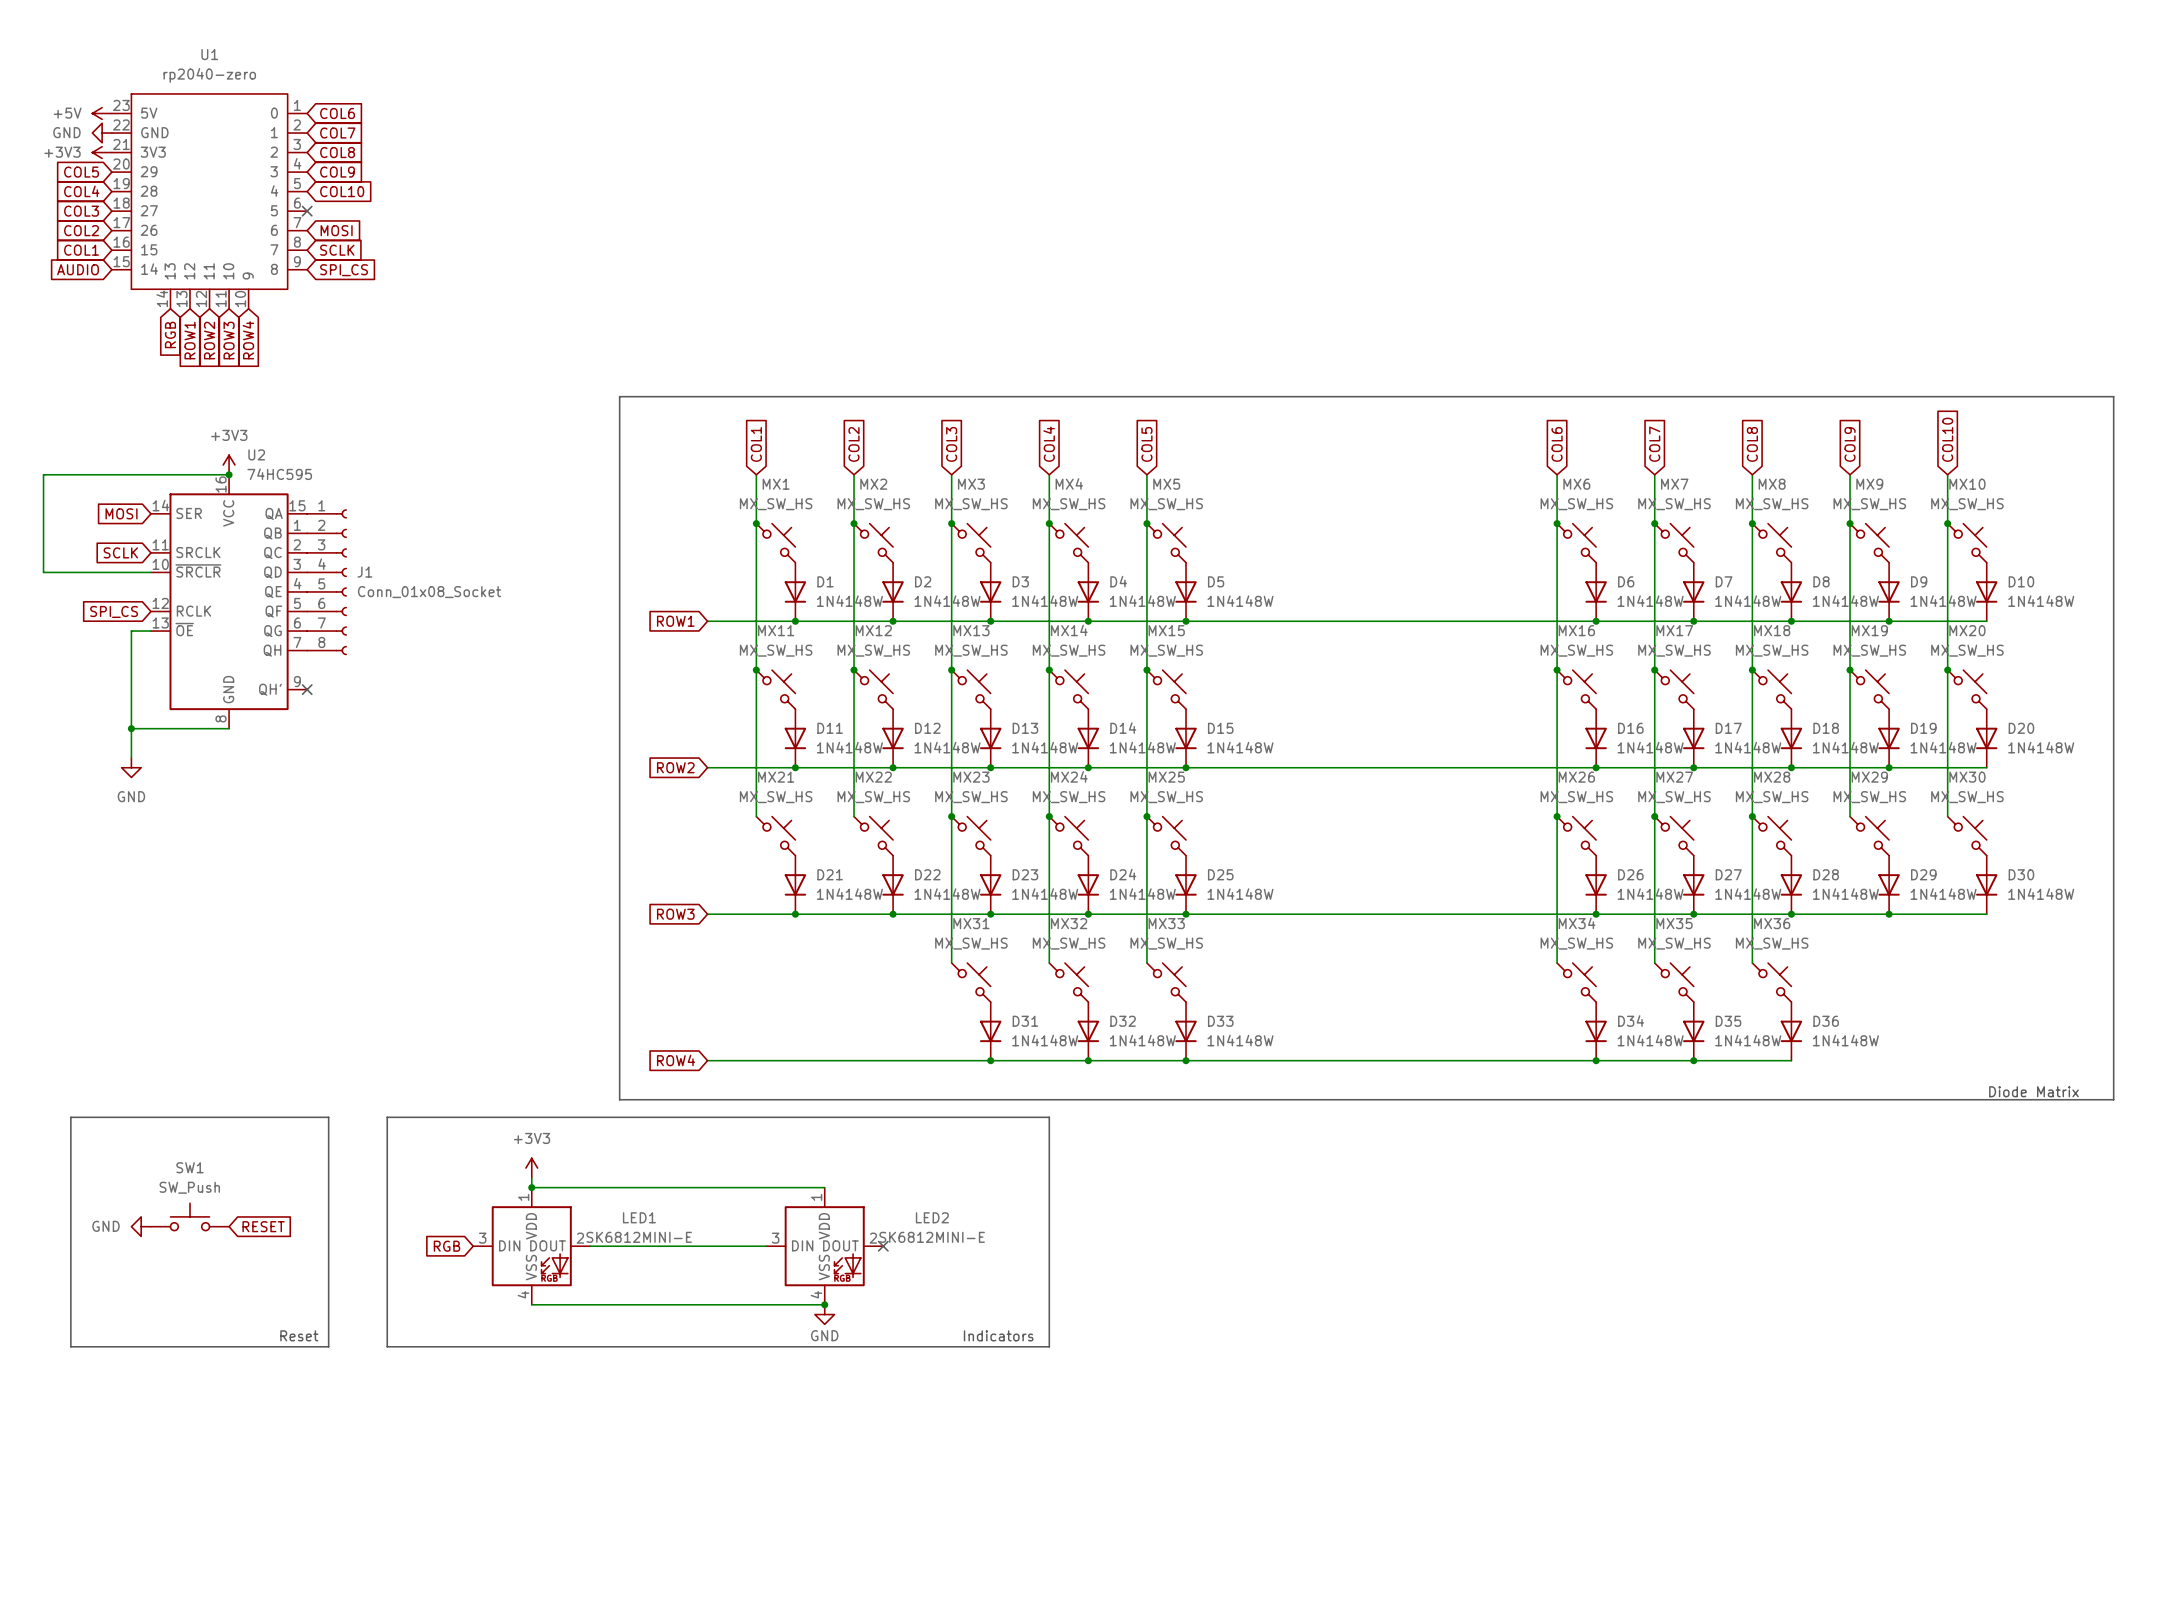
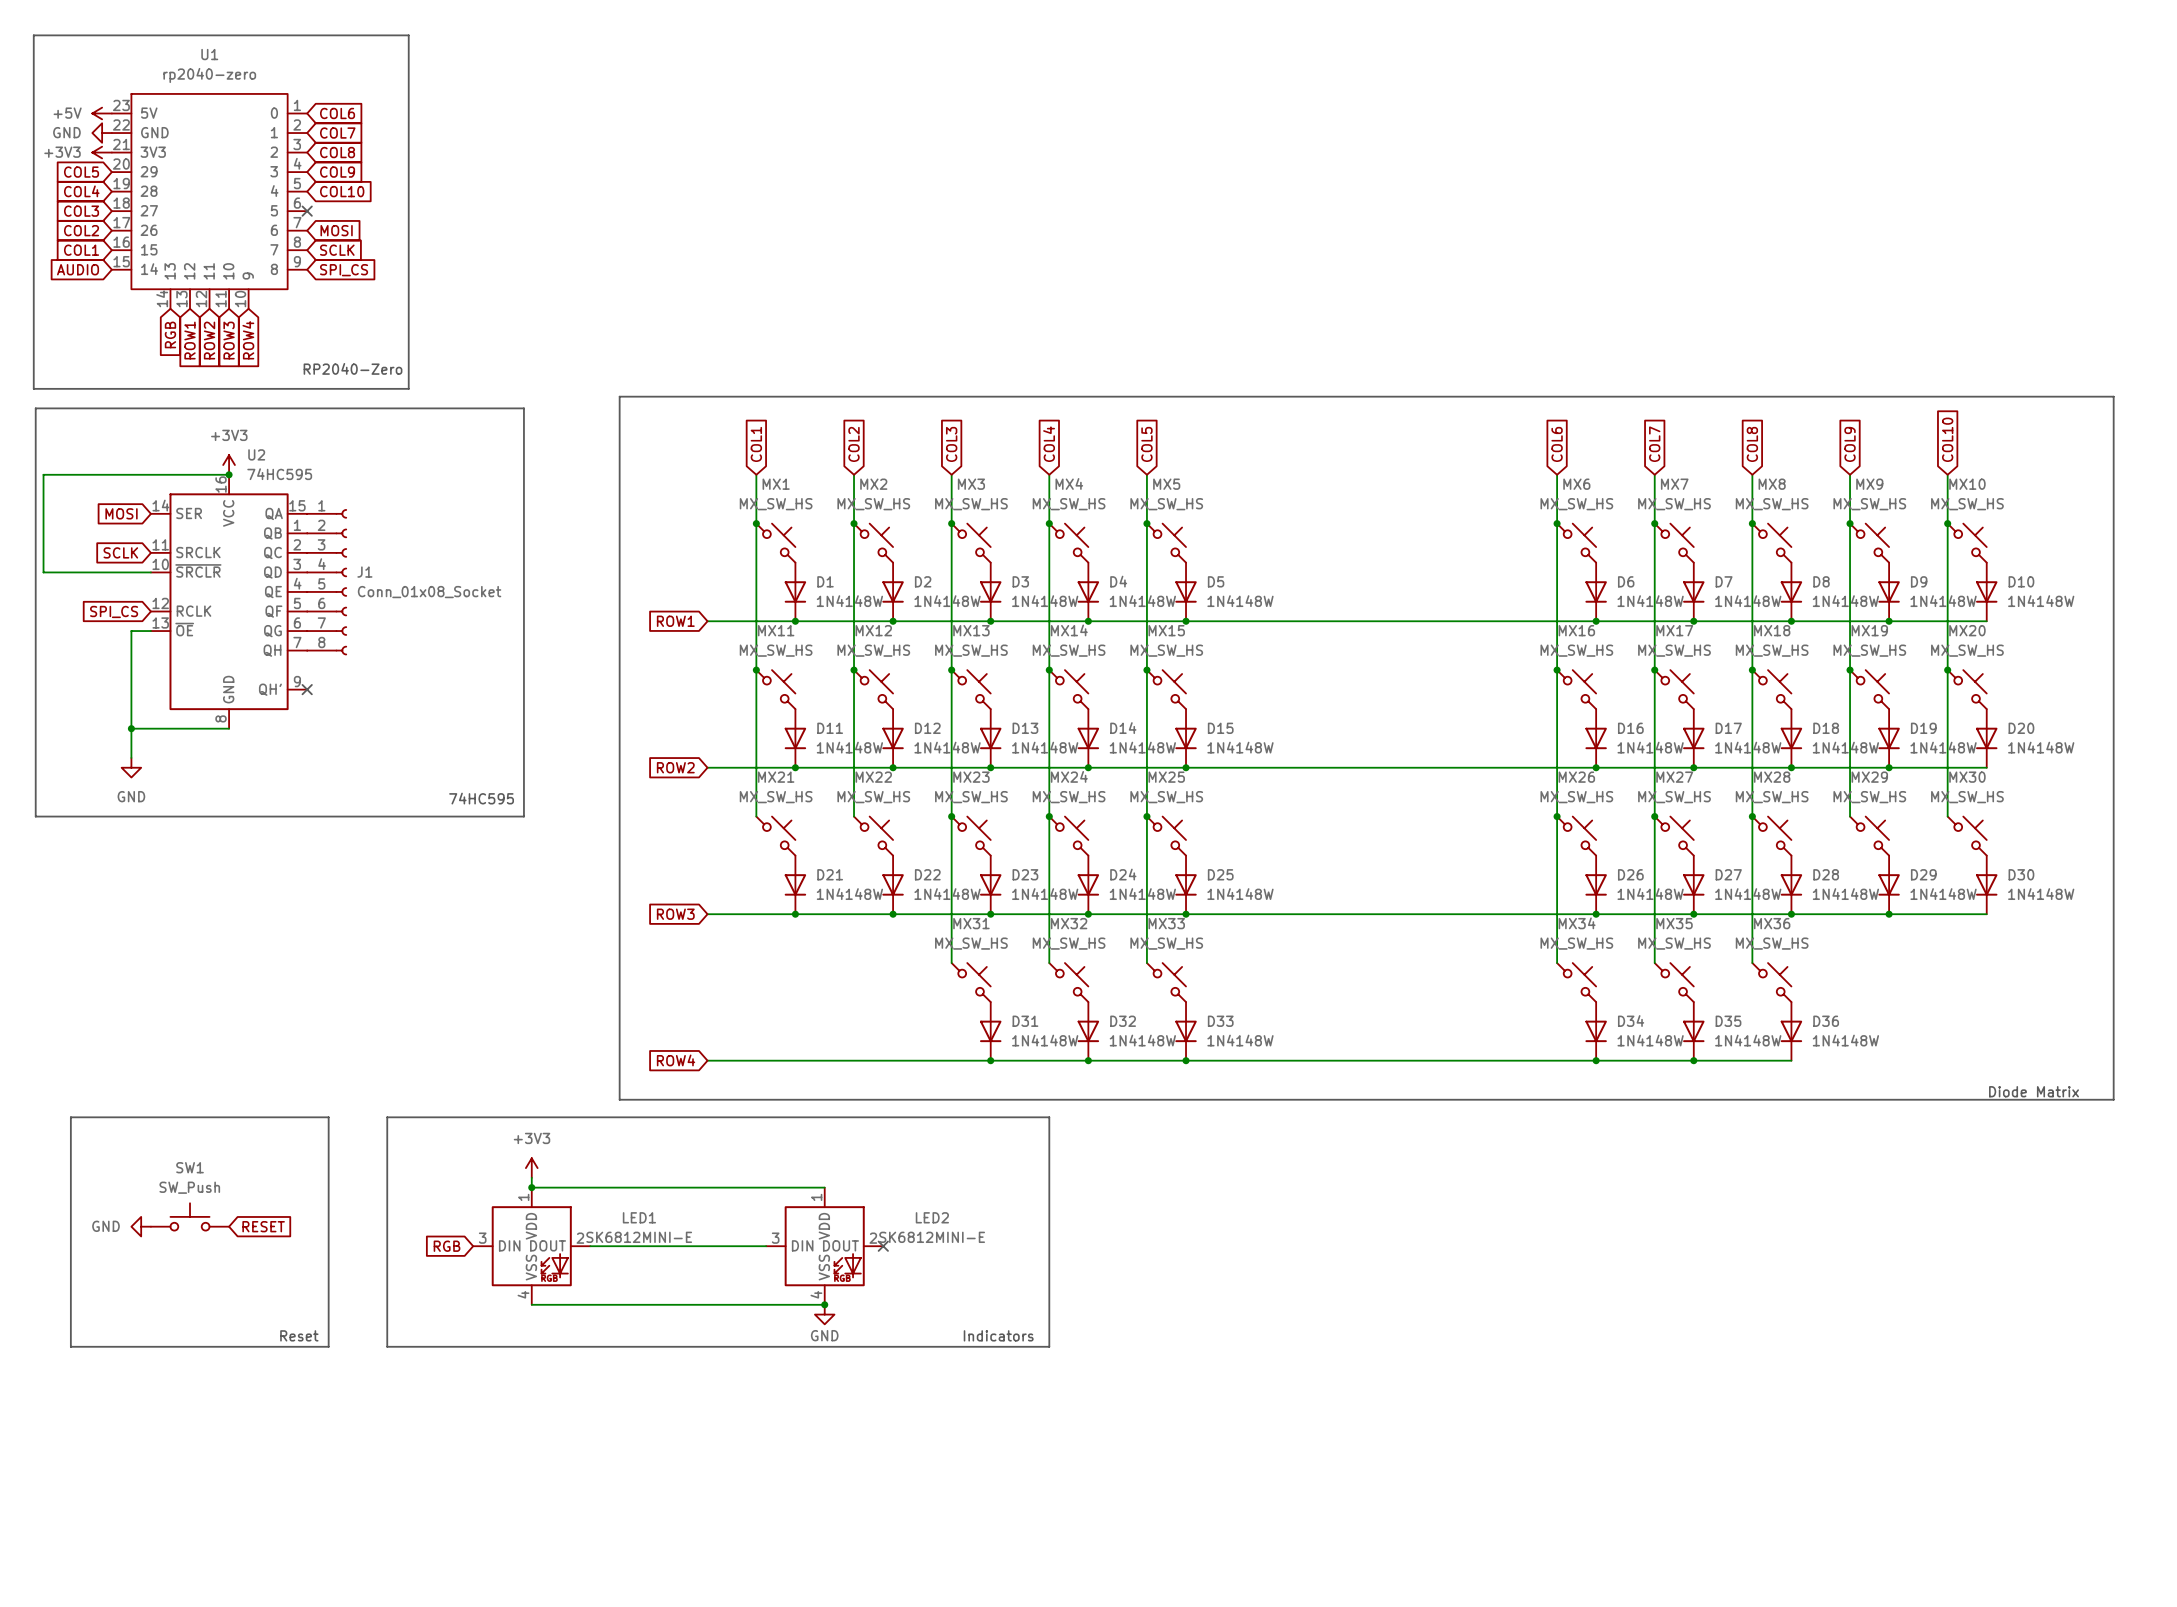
line: none -> (33, 35) (408, 35) (408, 388) (33, 388) (33, 35)
text: none -> RP2040-Zero (353, 368)
line: none -> (35, 408) (523, 408) (523, 816) (35, 816) (35, 408)
text: none -> 74HC595 (481, 798)

